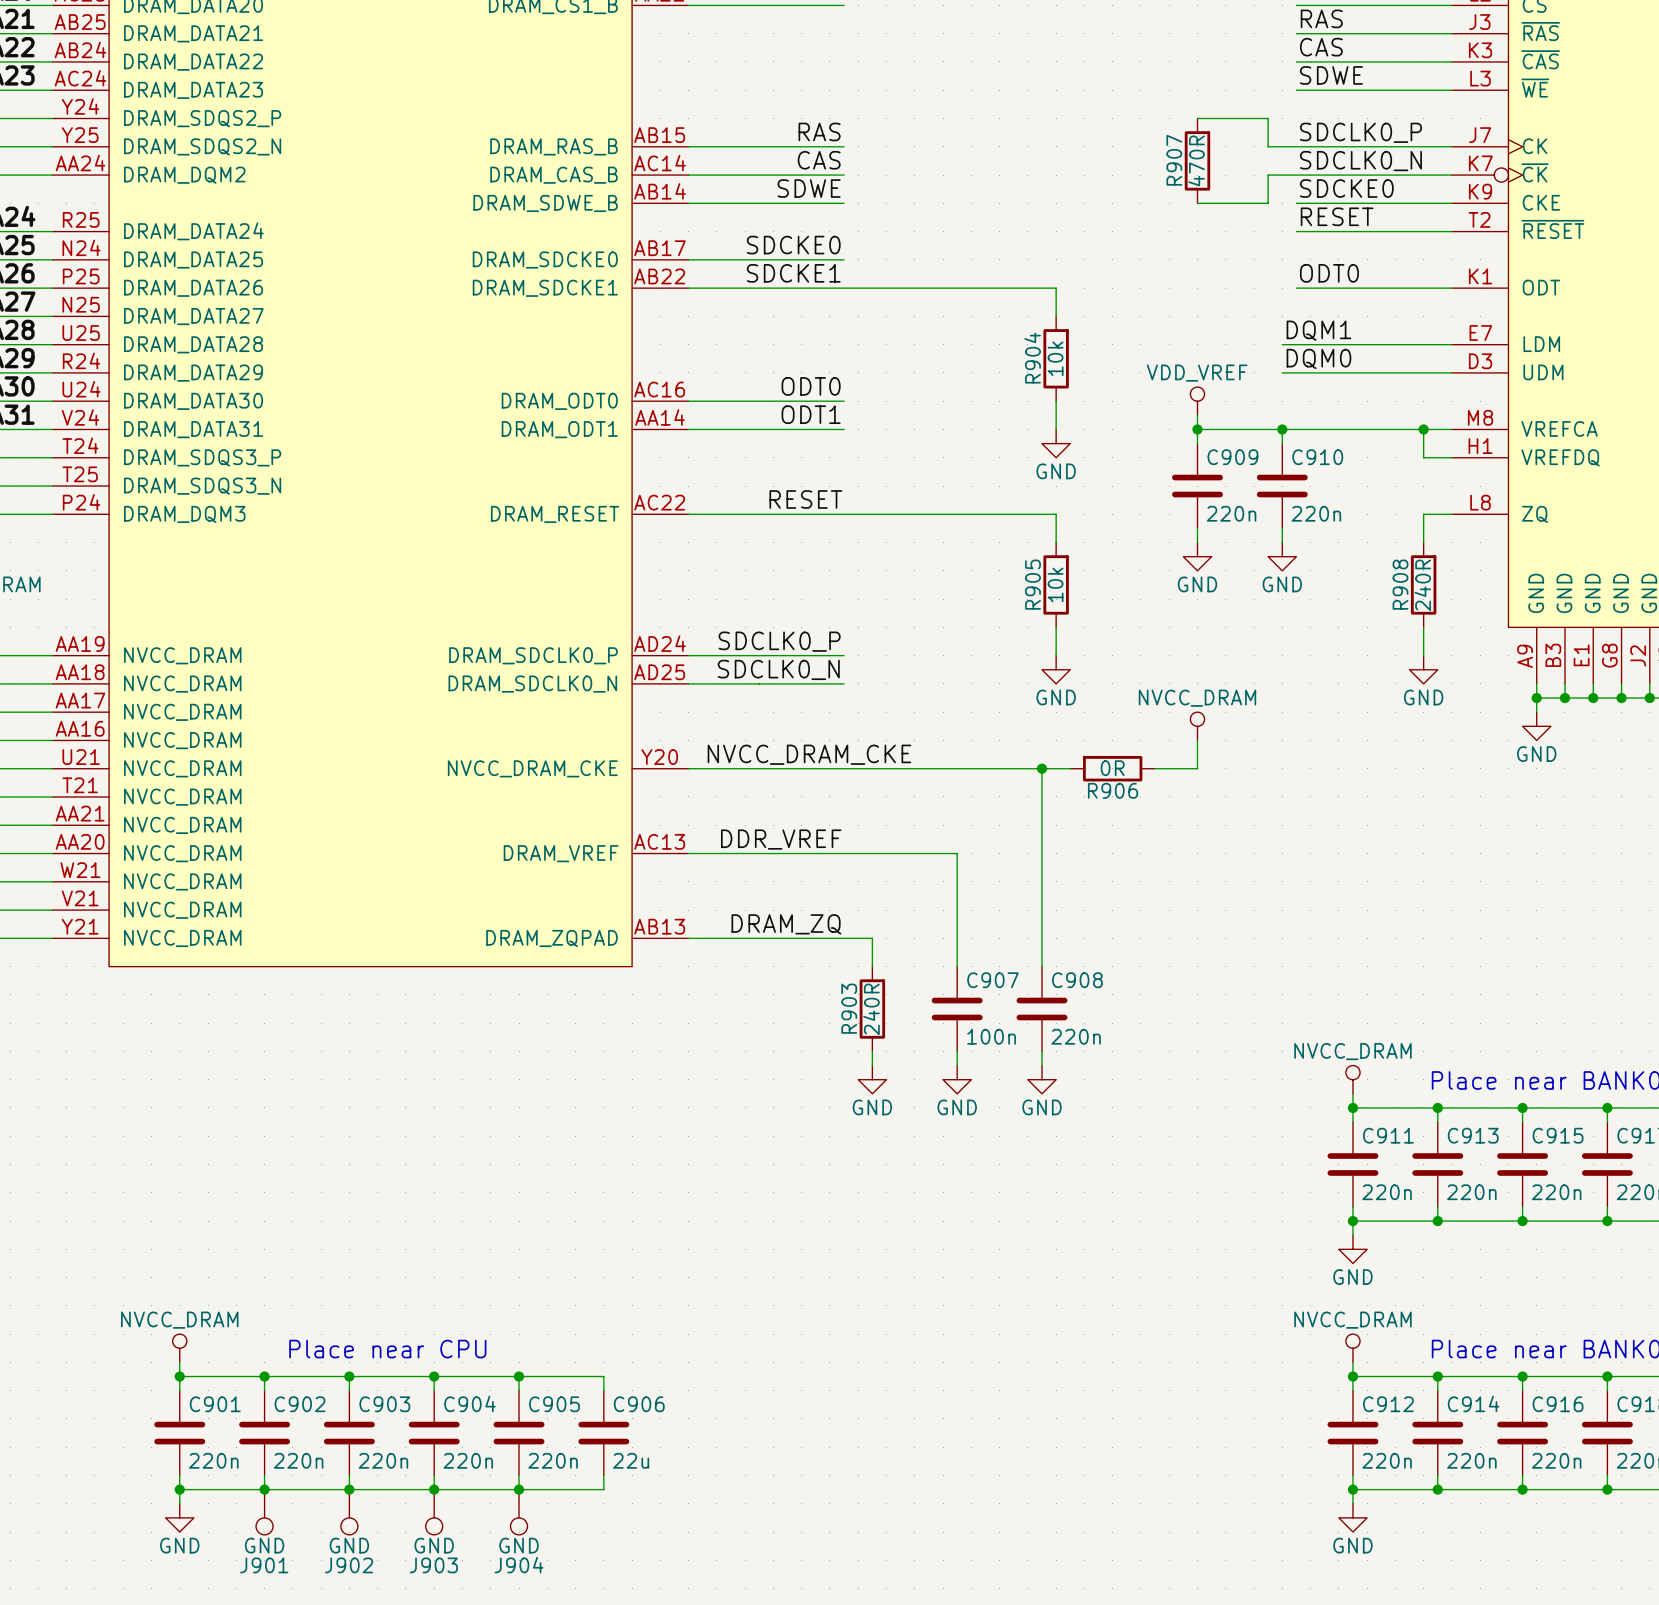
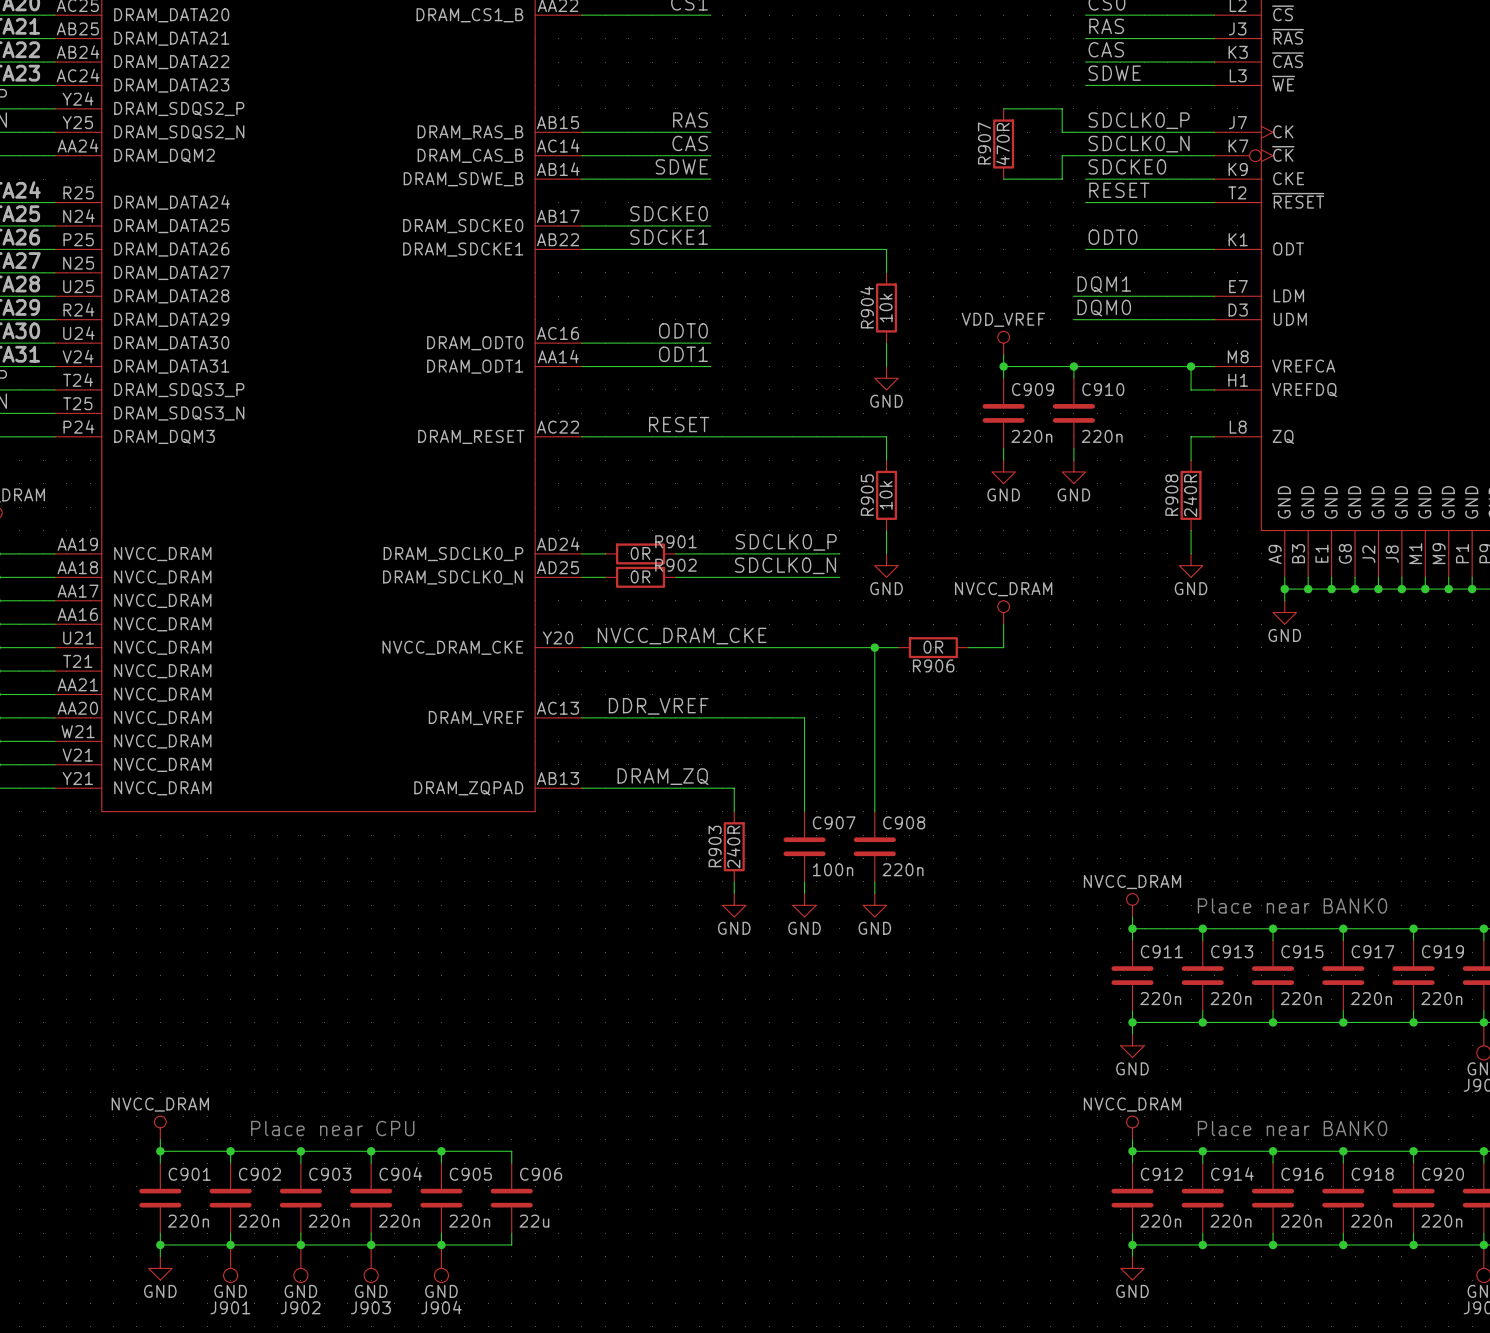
label position: SDCLK0_P (779, 641) -> SDCLK0_P (786, 542)
wire: (716, 655) (801, 655) -> none
R901: none -> 0R (640, 553)
wire: none -> (710, 553) (839, 553)
label position: SDCLK0_N (778, 669) -> SDCLK0_N (785, 565)
wire: (716, 683) (801, 683) -> none
R902: none -> 0R (640, 577)
wire: none -> (710, 577) (839, 577)

